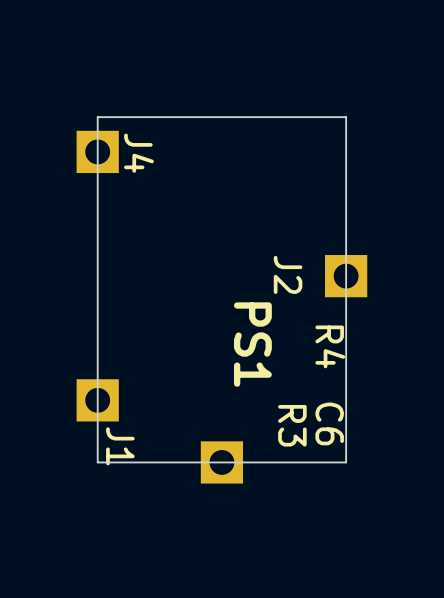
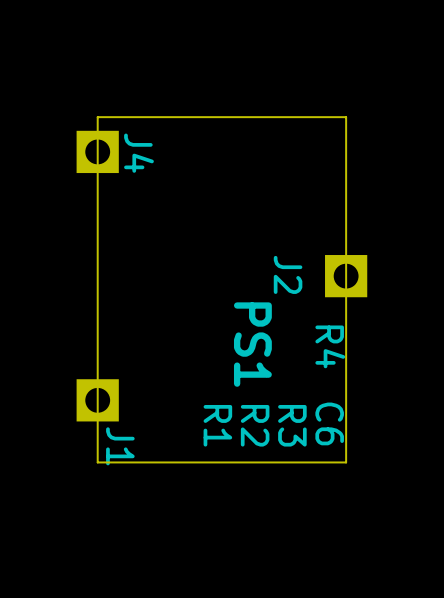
R1: none -> (217, 425)
R2: none -> (255, 425)
part: (221, 462) -> none

